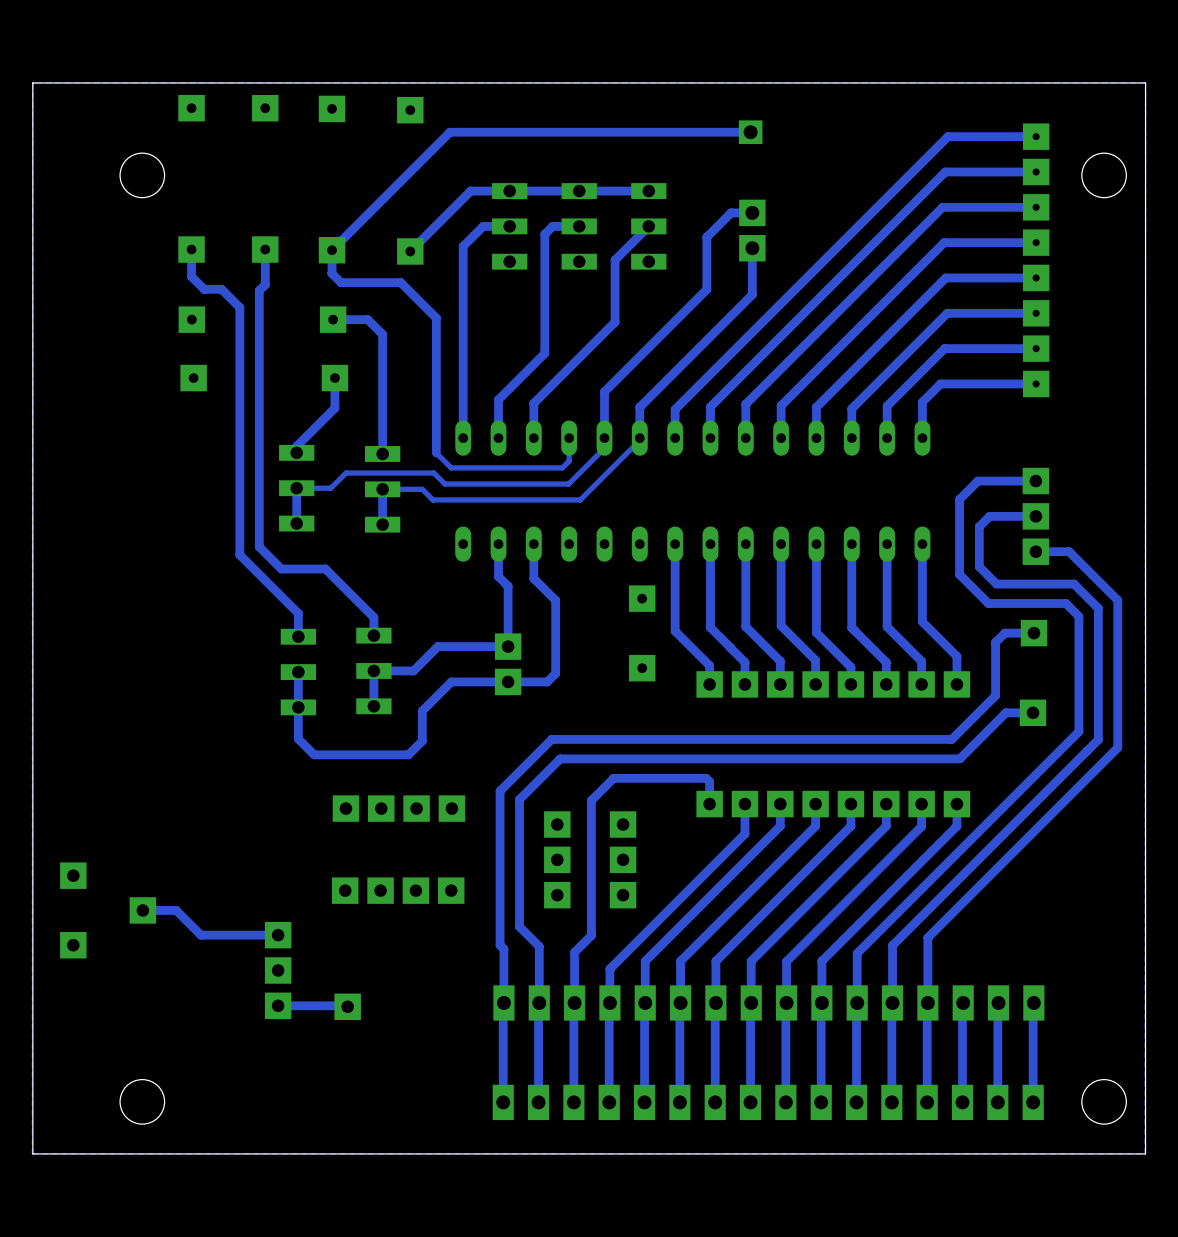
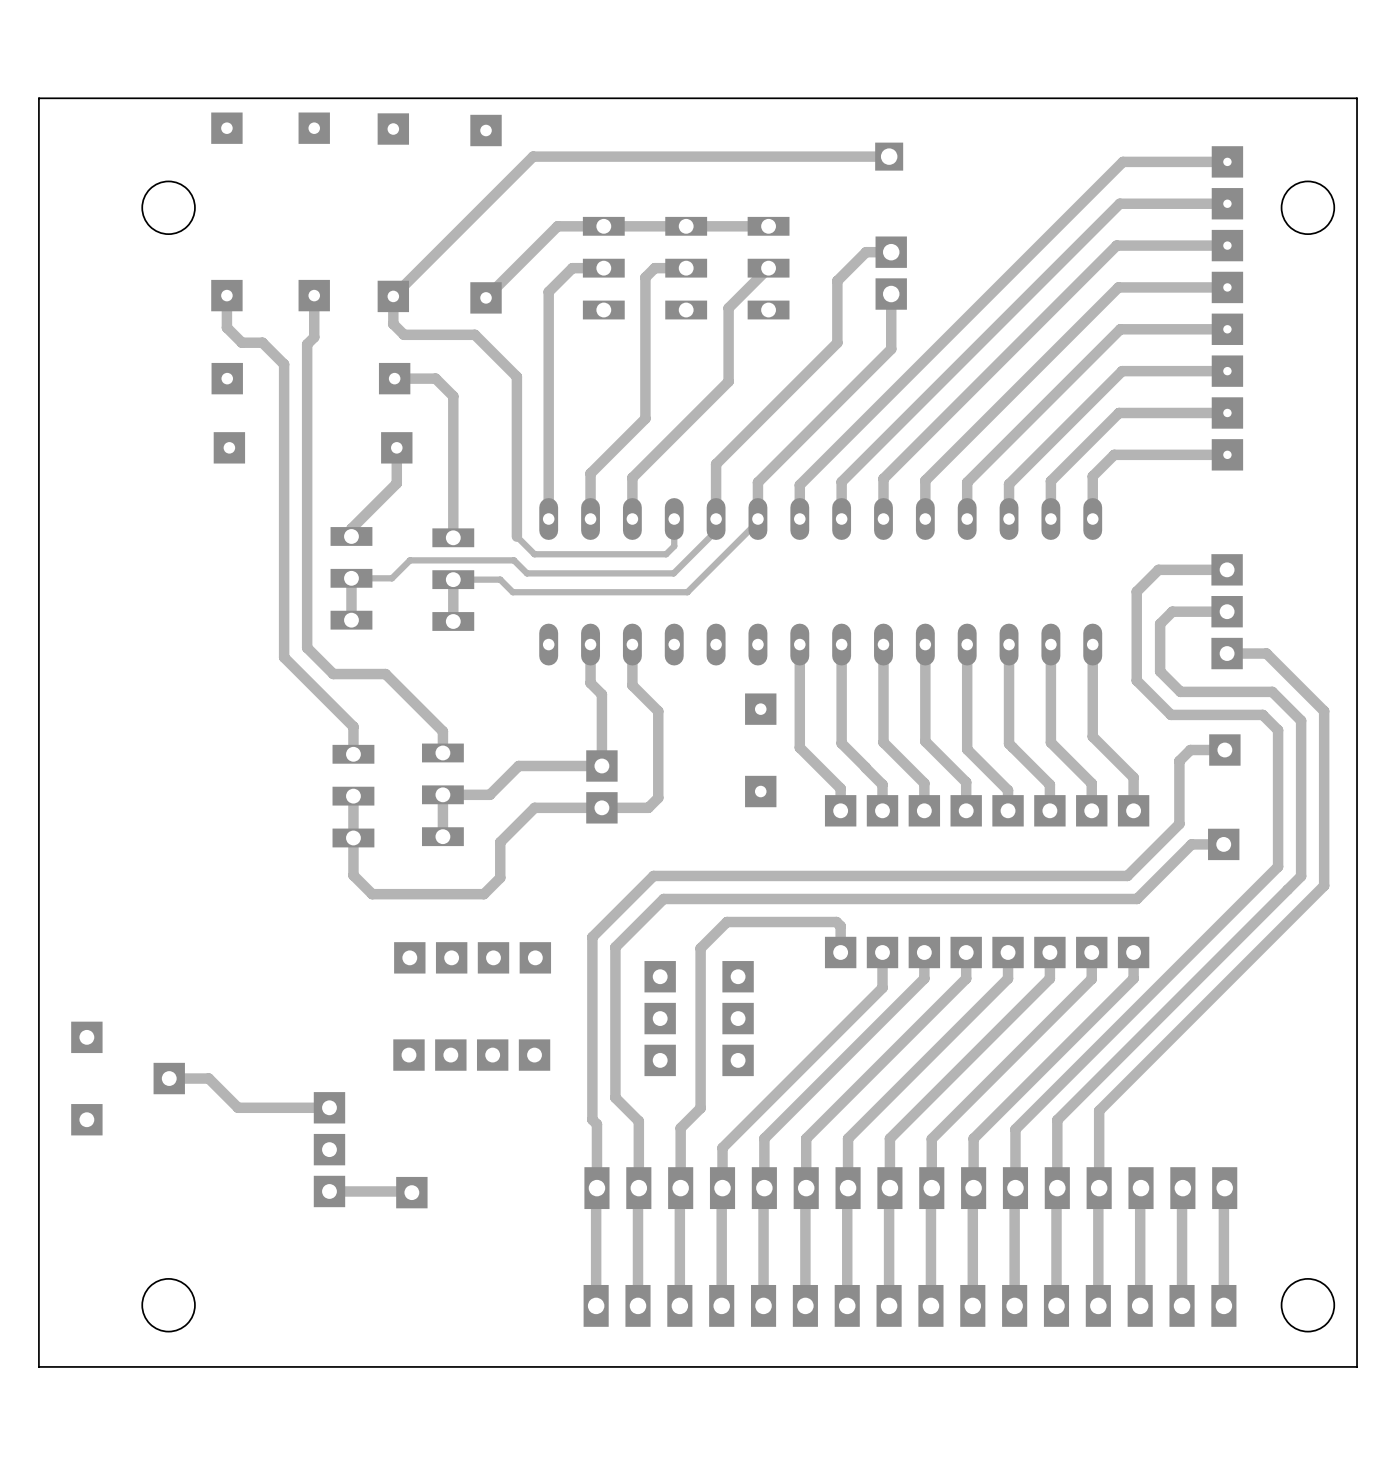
zone outline: (1145, 82) (32, 82) (32, 1153) (1144, 1153) (1145, 82) -> none

